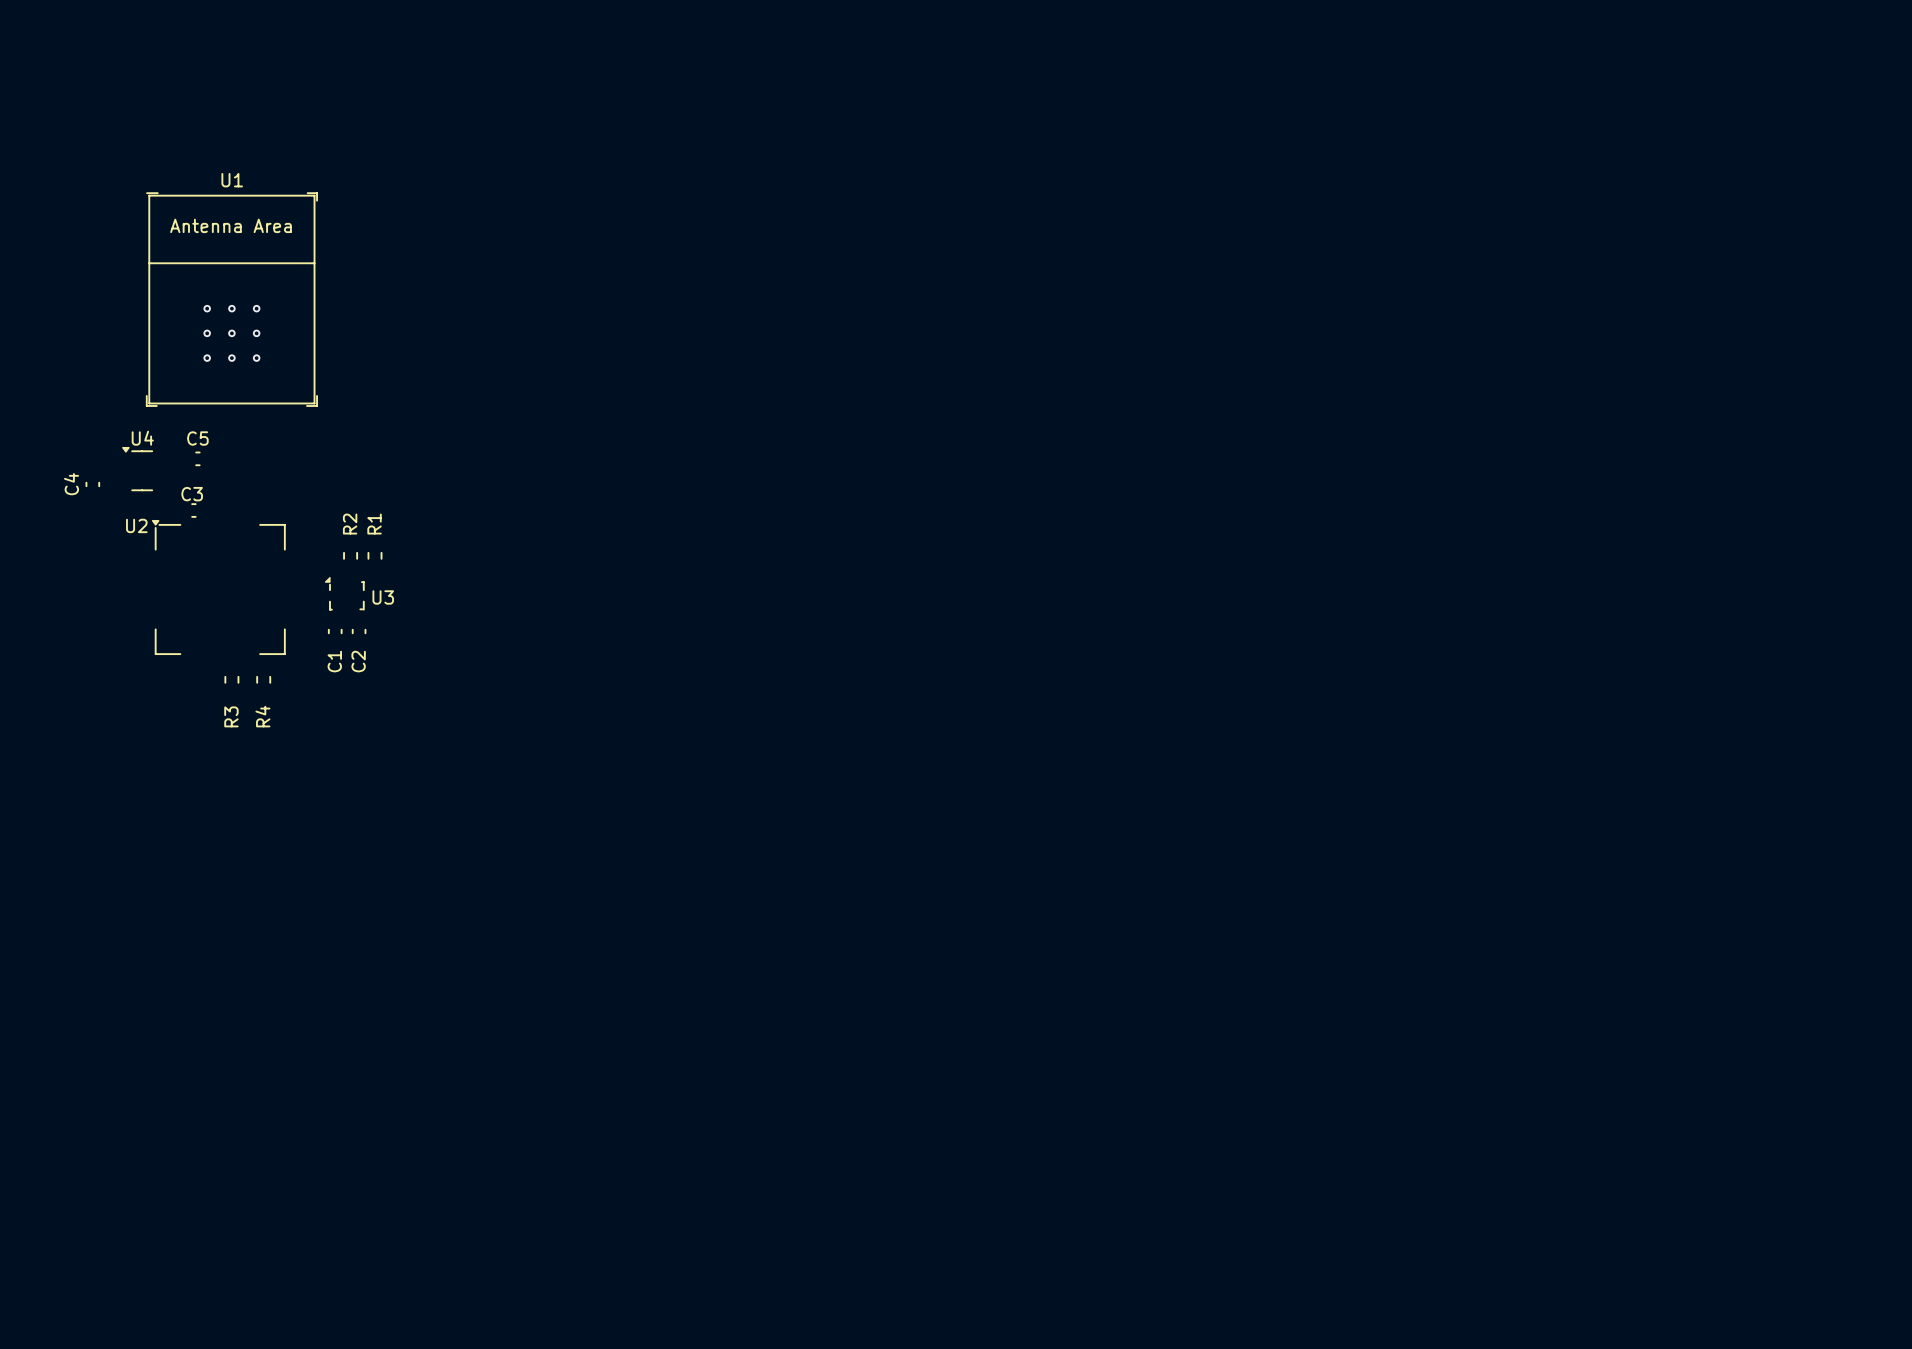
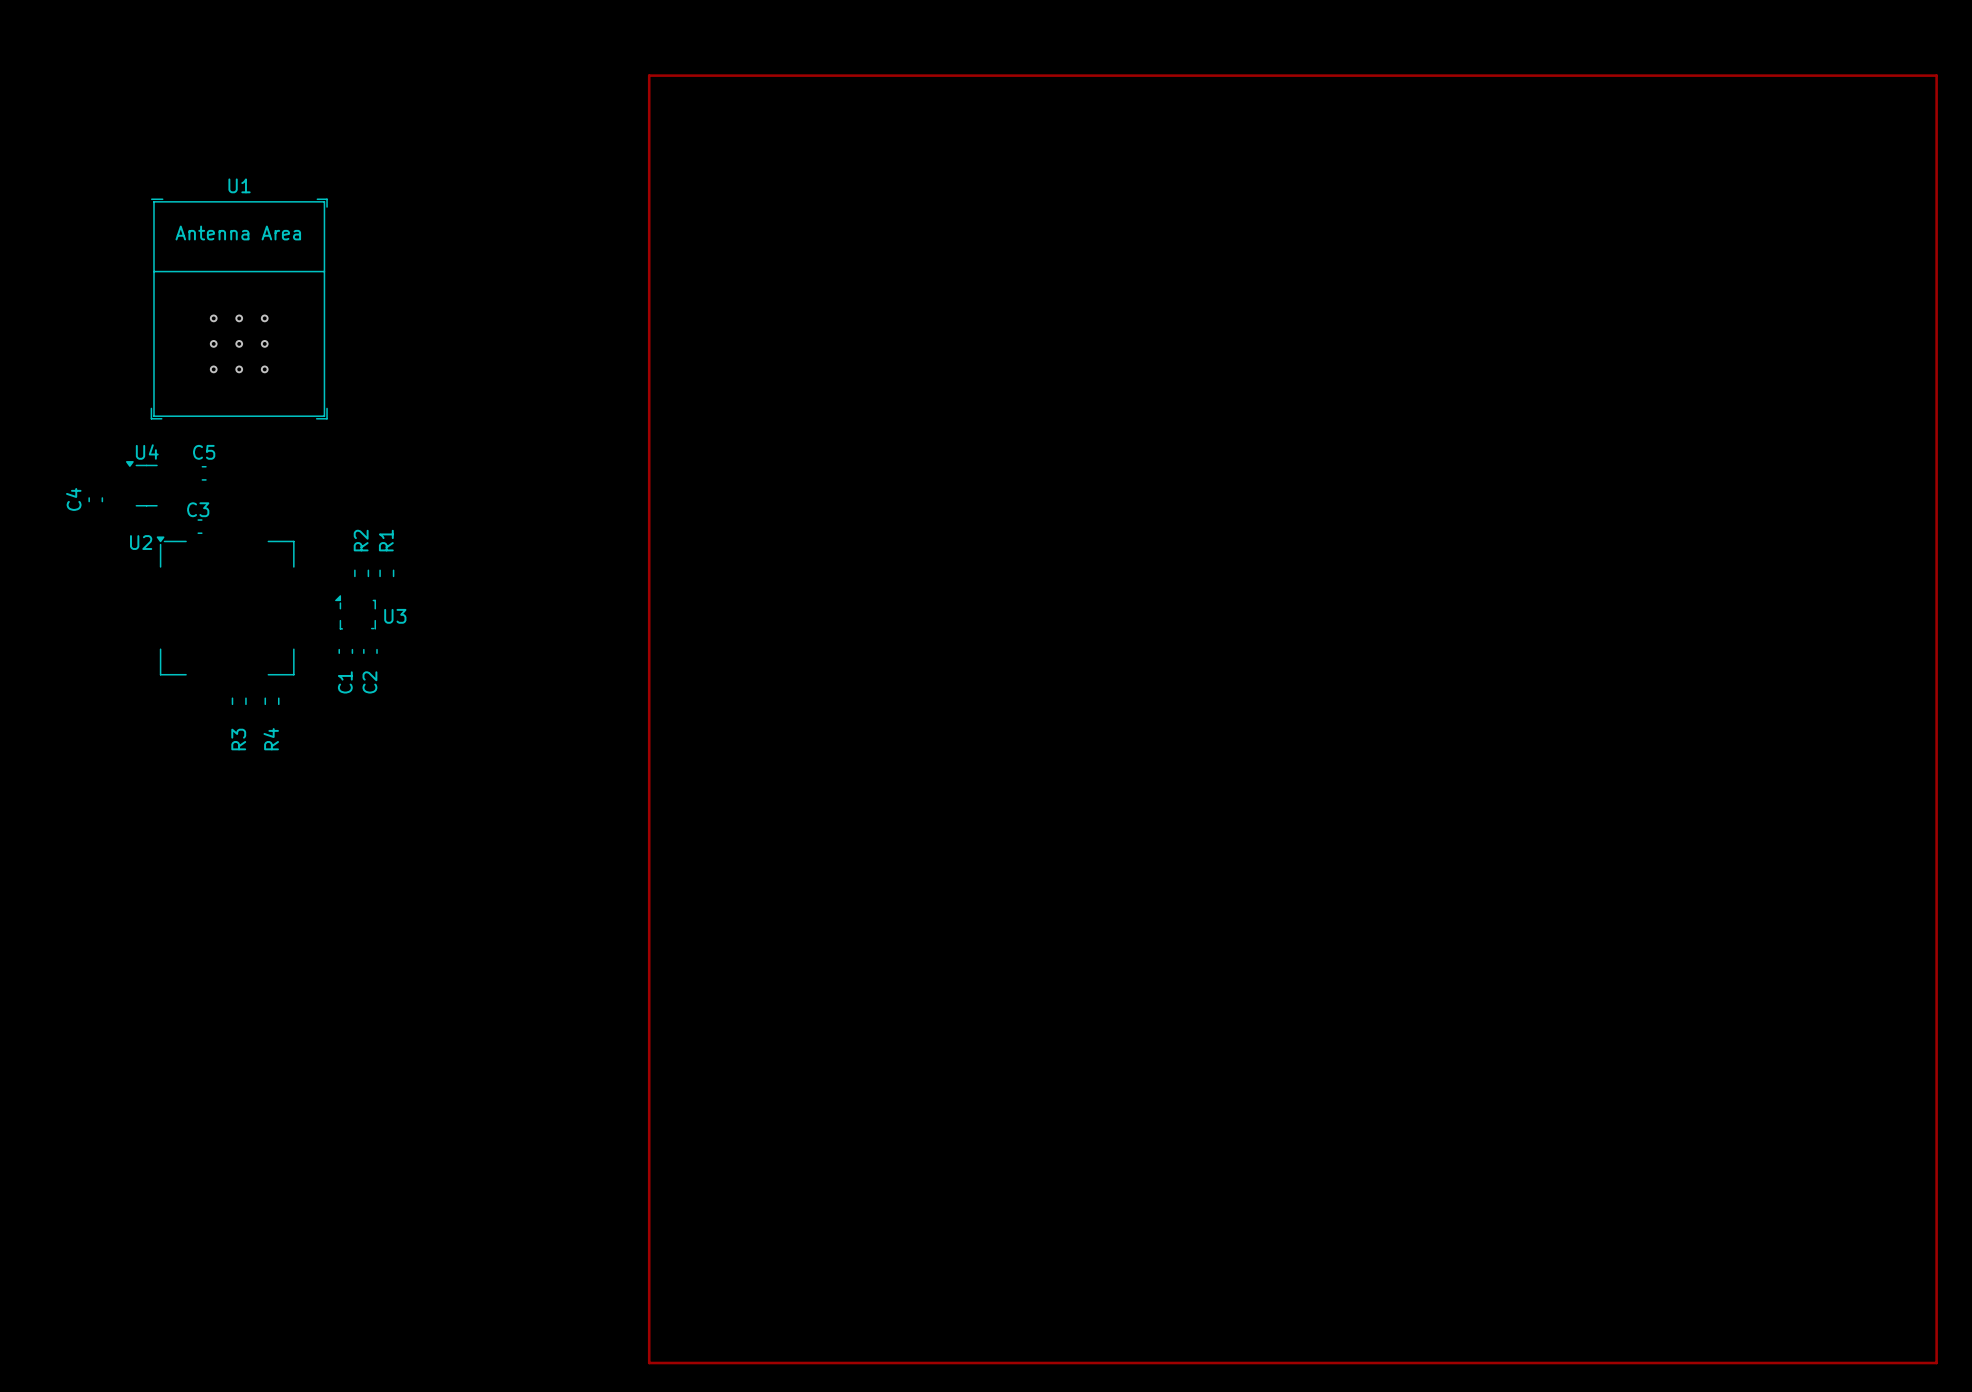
track: none -> (649, 75) (1936, 75) (1936, 1363) (649, 1363) (649, 75)

